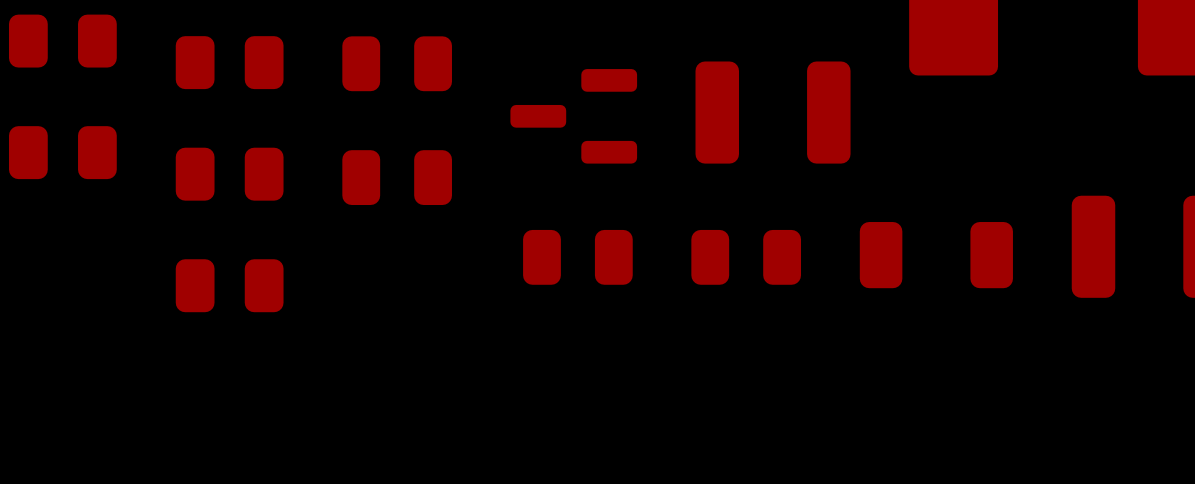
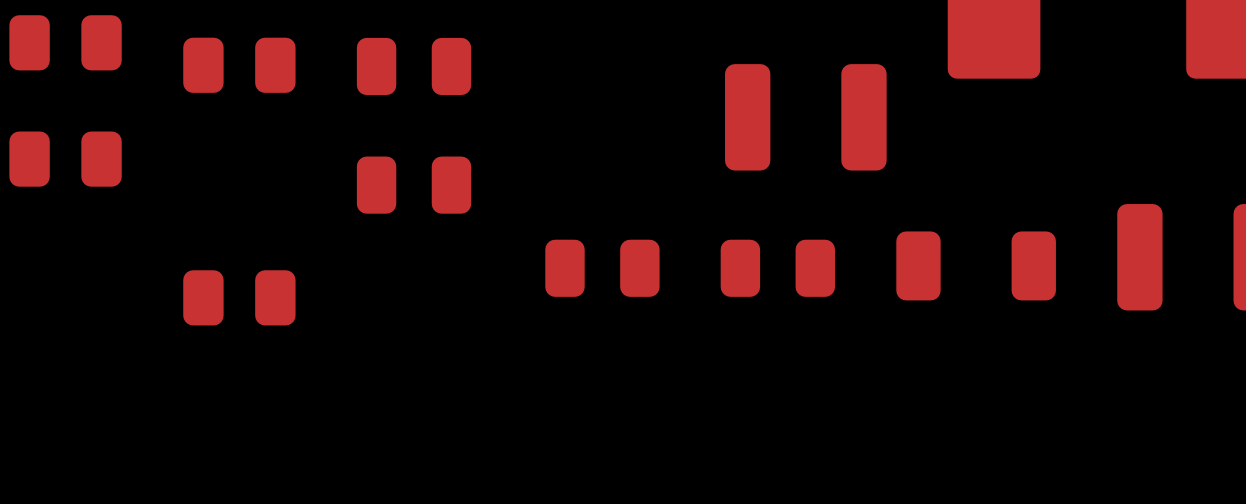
part: (573, 116) -> none
part: (229, 174) -> none

